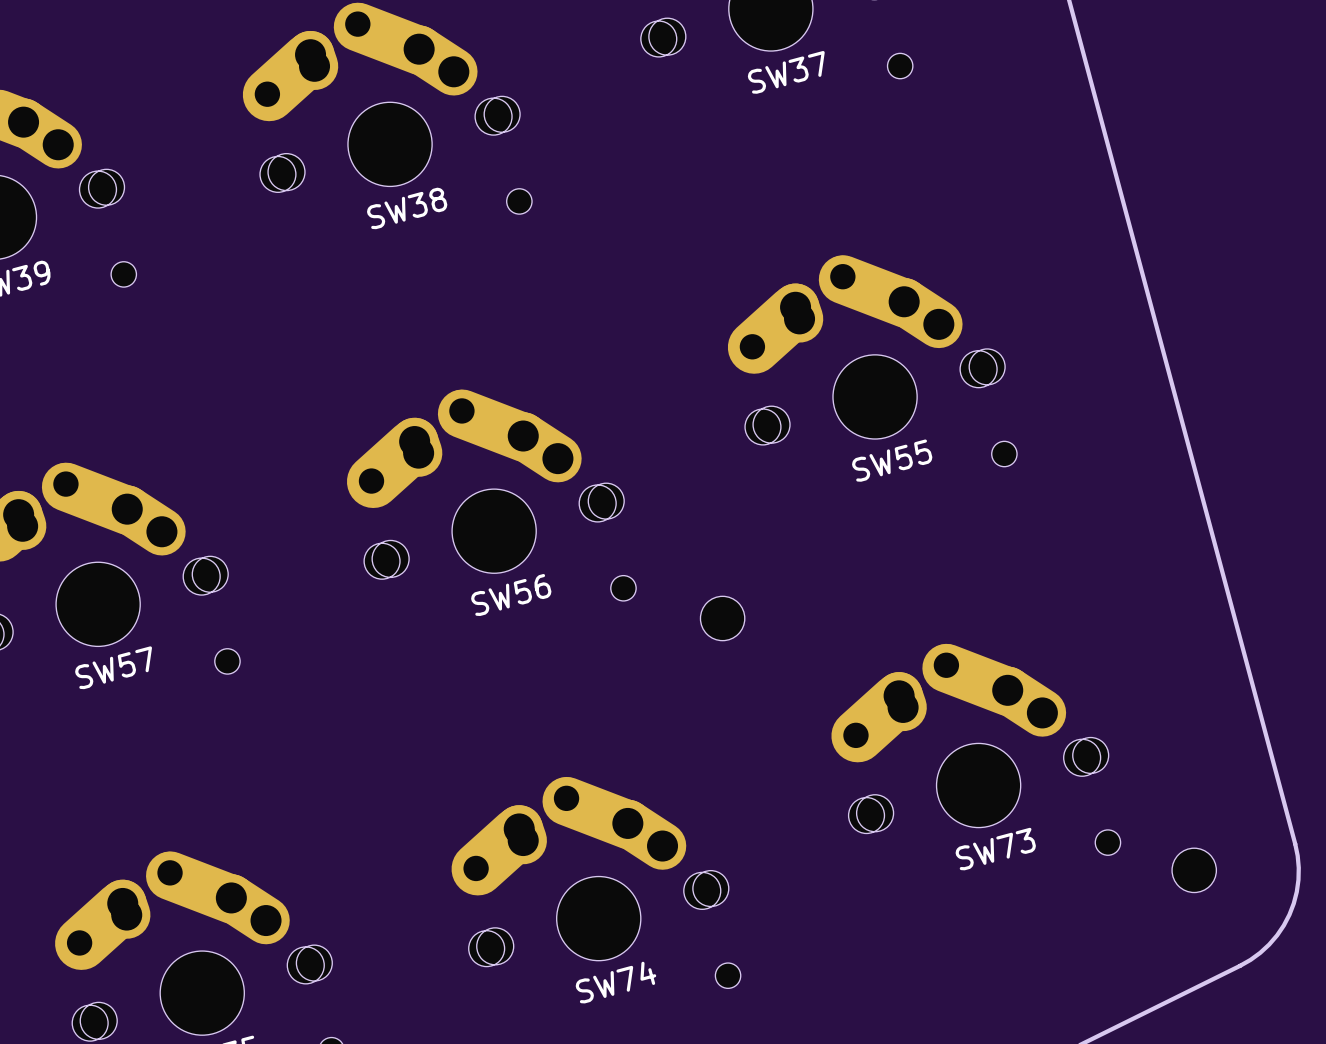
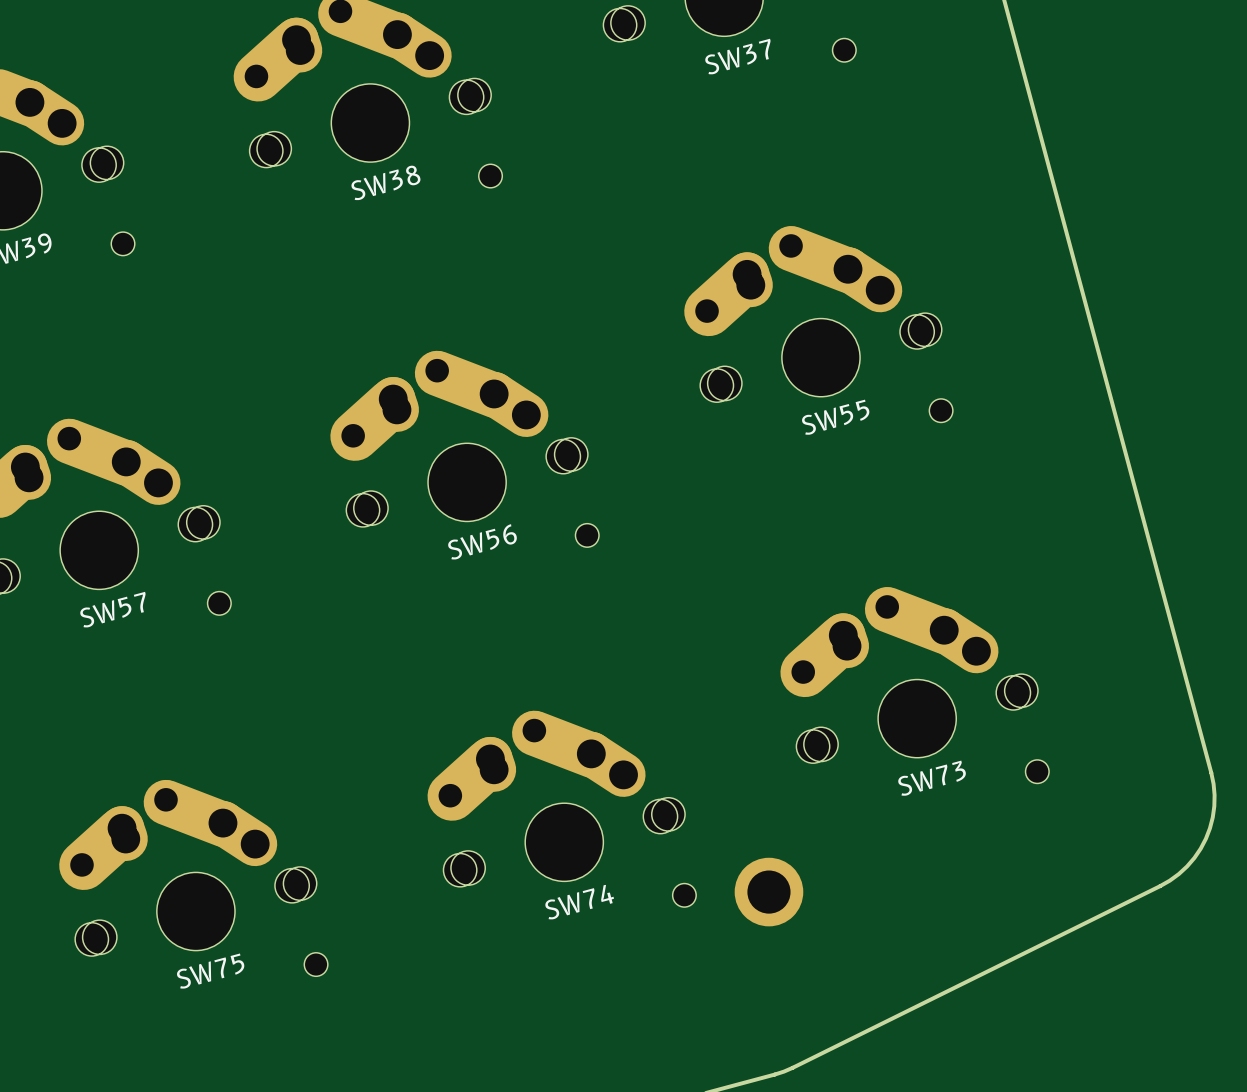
part: (722, 618) -> none
part: (1194, 870) -> none
part: none -> (768, 892)

